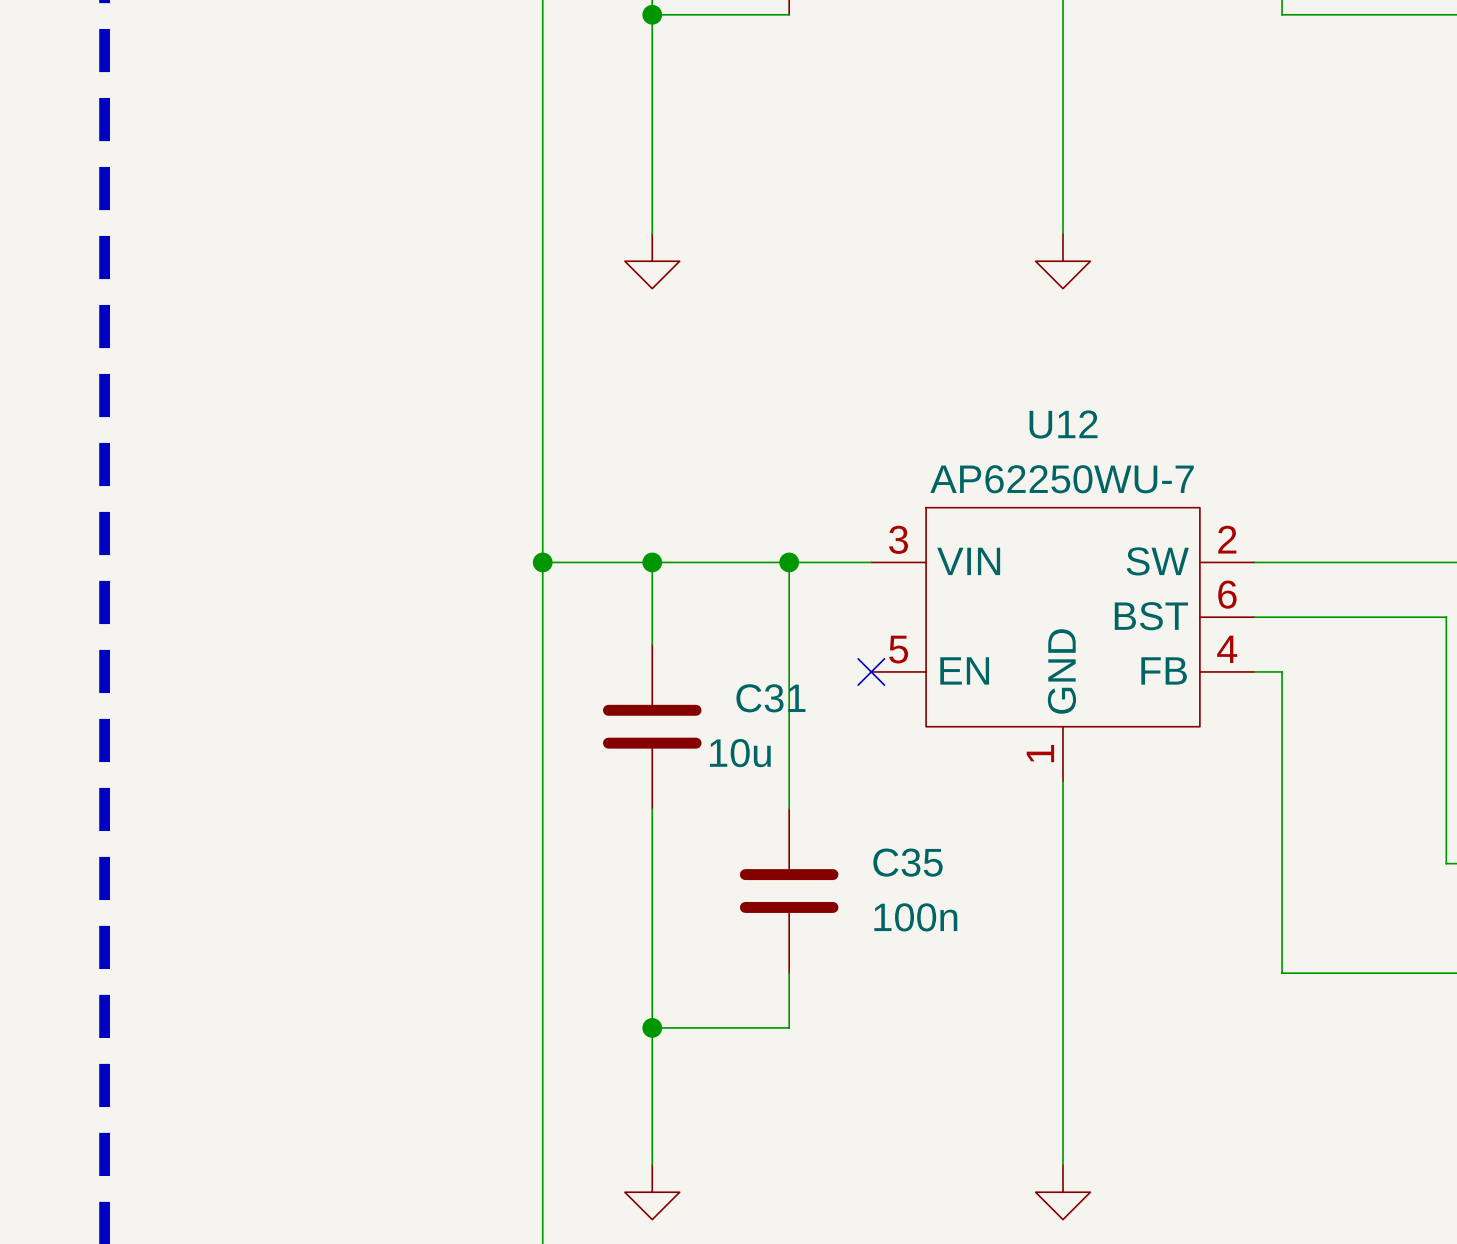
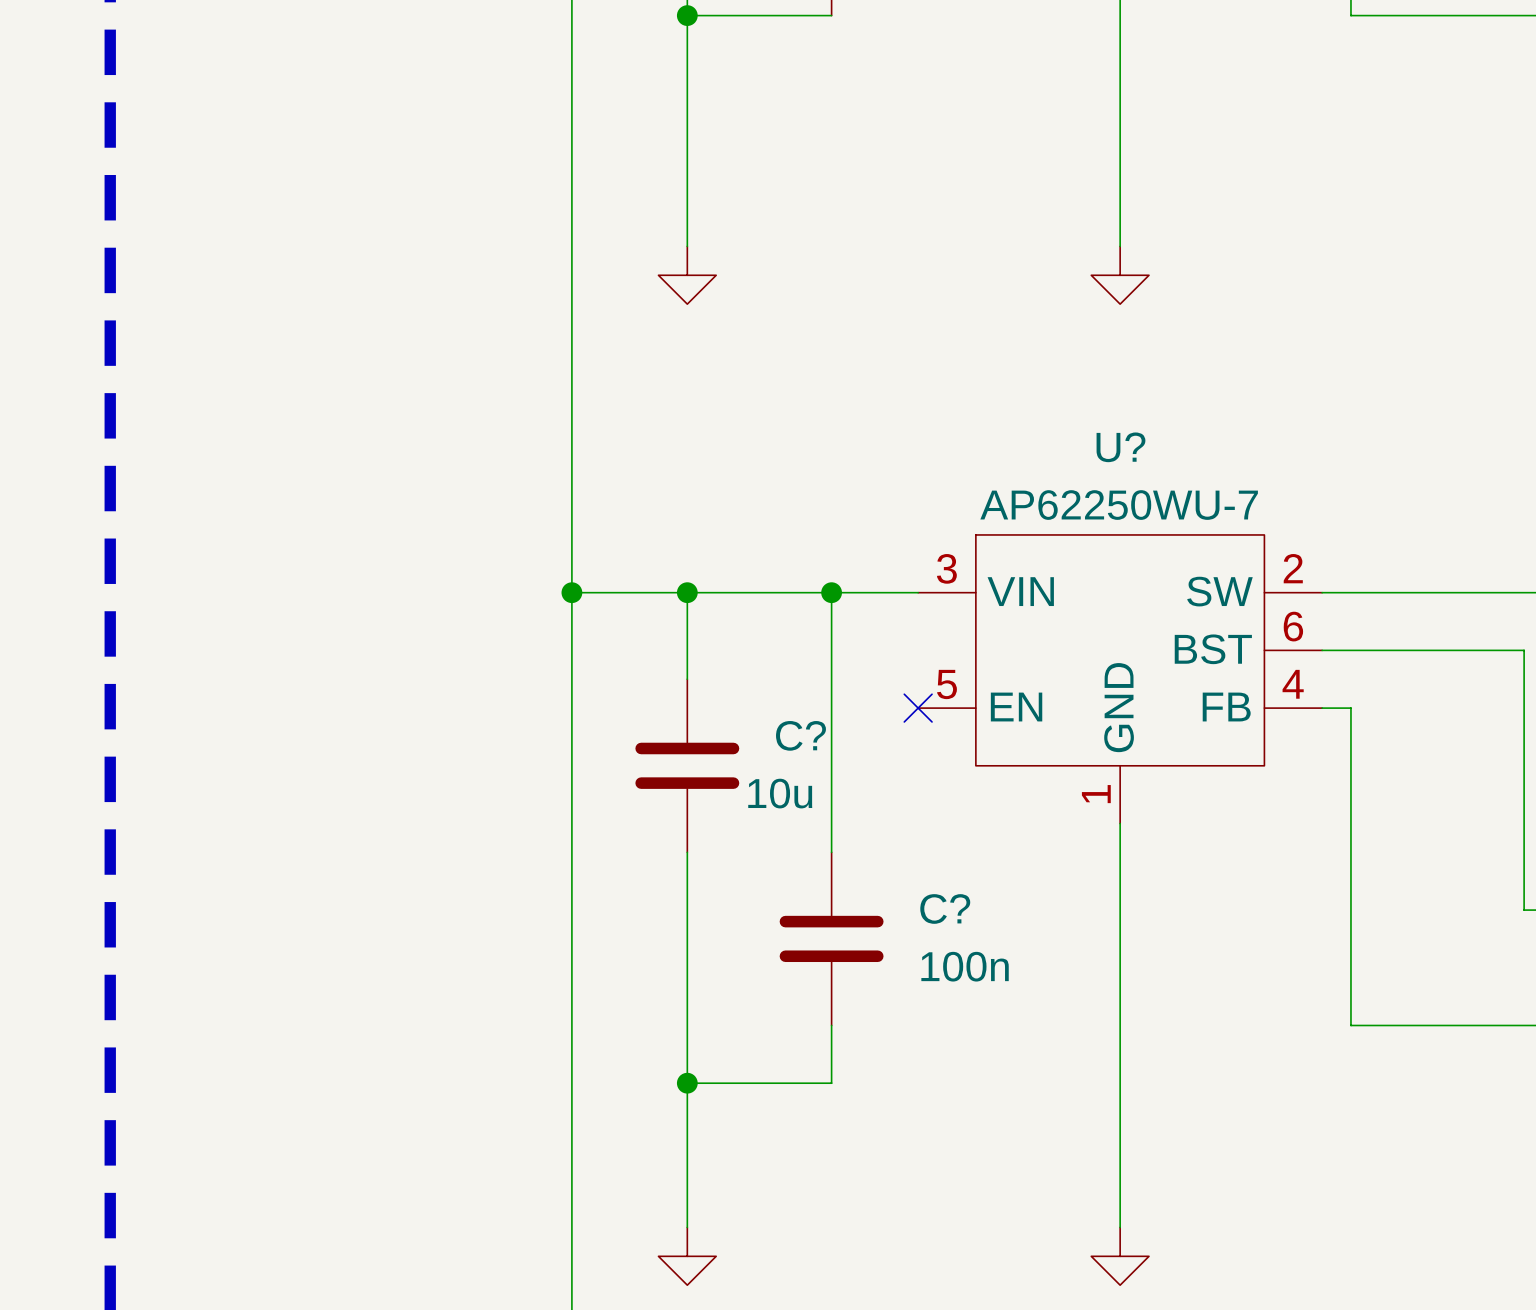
U12 name: U12 (1063, 424) -> U? (1120, 447)
C31 name: C31 (770, 698) -> C? (800, 735)
C35 name: C35 (908, 862) -> C? (945, 908)

